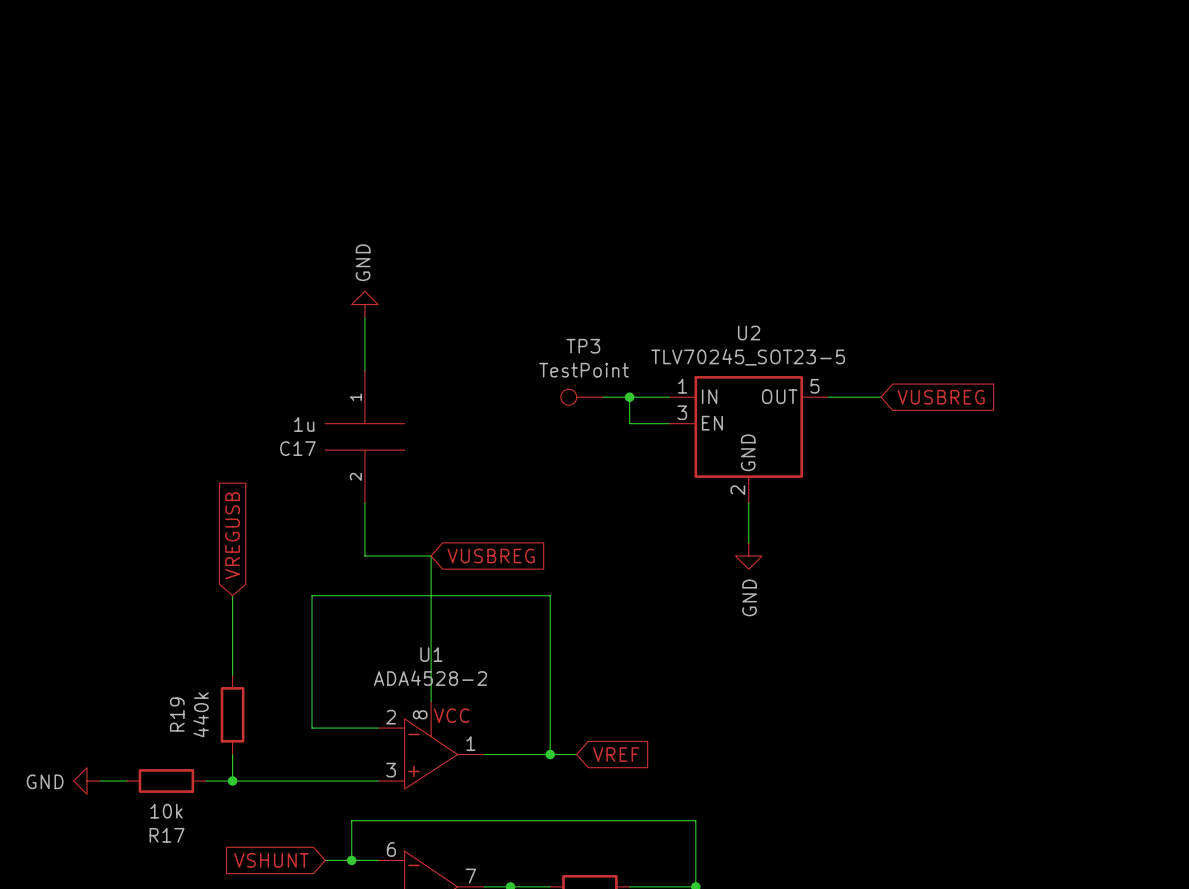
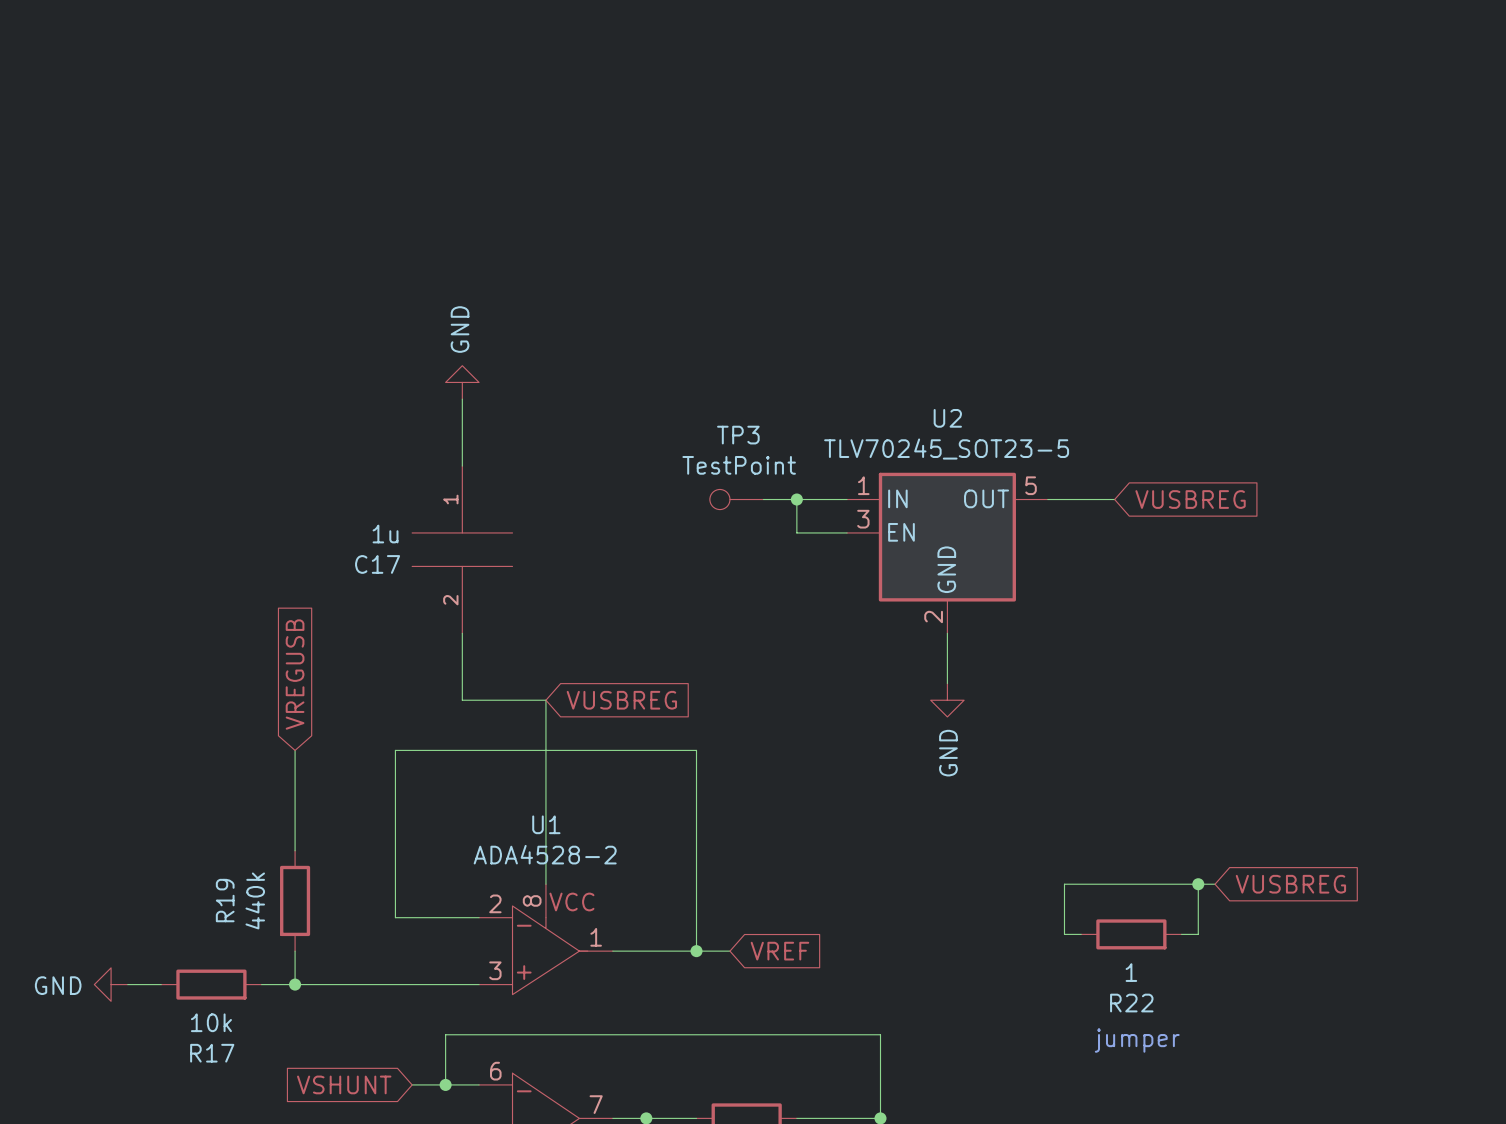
wire: none -> (1198, 884) (1198, 934) (1181, 934)
junction: none -> (1198, 884)
wire: none -> (1215, 884) (1064, 884) (1064, 934) (1081, 934)
global label: none -> VUSBREG (1290, 884)
R22: none -> 1 (1131, 934)
text: none -> jumper (1137, 1040)

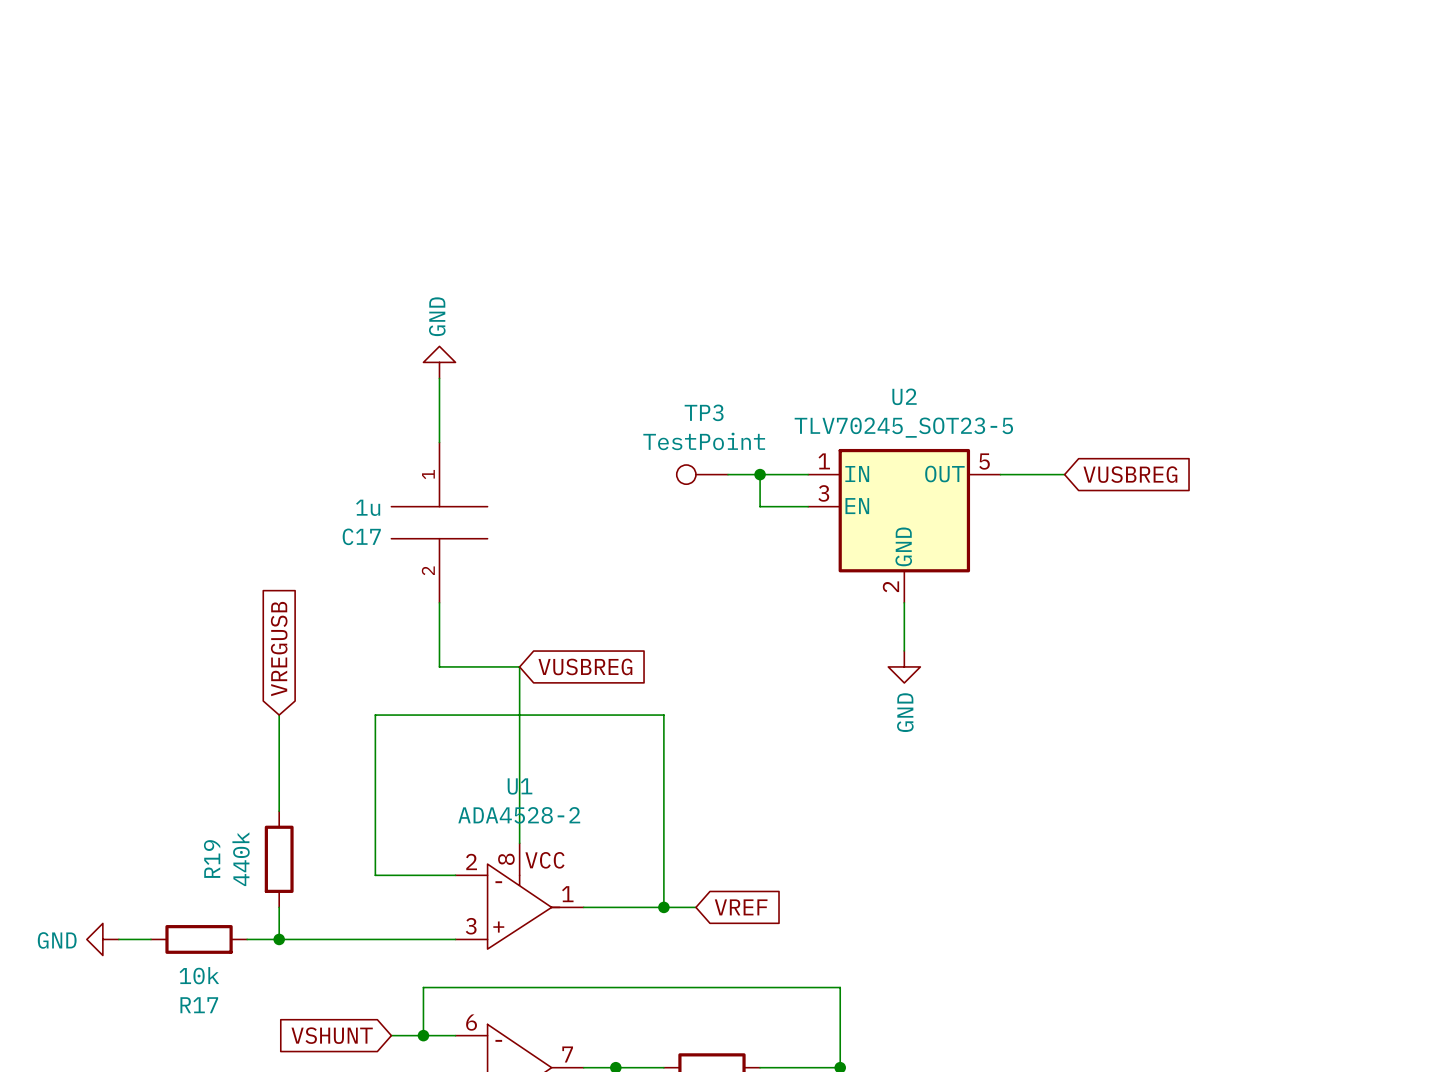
wire: (1198, 884) (1198, 934) (1181, 934) -> none
junction: (1198, 884) -> none
wire: (1215, 884) (1064, 884) (1064, 934) (1081, 934) -> none
global label: VUSBREG (1290, 884) -> none
R22: 1 (1131, 934) -> none
text: jumper (1137, 1040) -> none

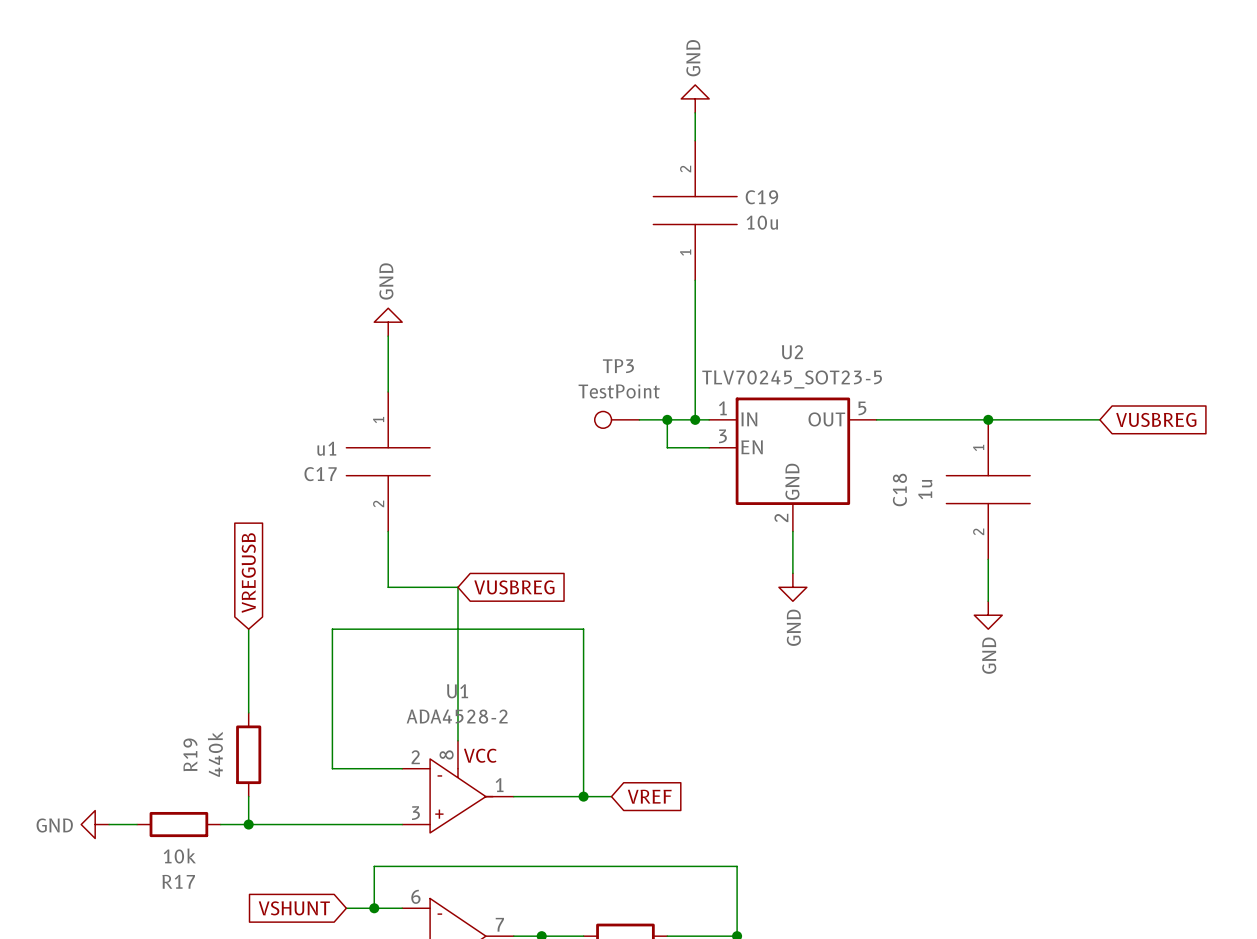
power symbol: none -> GND (695, 98)
wire: none -> (695, 112) (695, 140)
C19: none -> 10u (695, 210)
wire: none -> (695, 280) (695, 419)
junction: none -> (695, 419)
wire: none -> (932, 419) (1099, 419)
junction: none -> (988, 419)
global label position: VUSBREG (1130, 474) -> VUSBREG (1156, 419)
C17 value: 1u (368, 507) -> u1 (326, 448)
C18: none -> 1u (988, 489)
wire: none -> (988, 559) (988, 601)
power symbol: none -> GND (988, 615)

